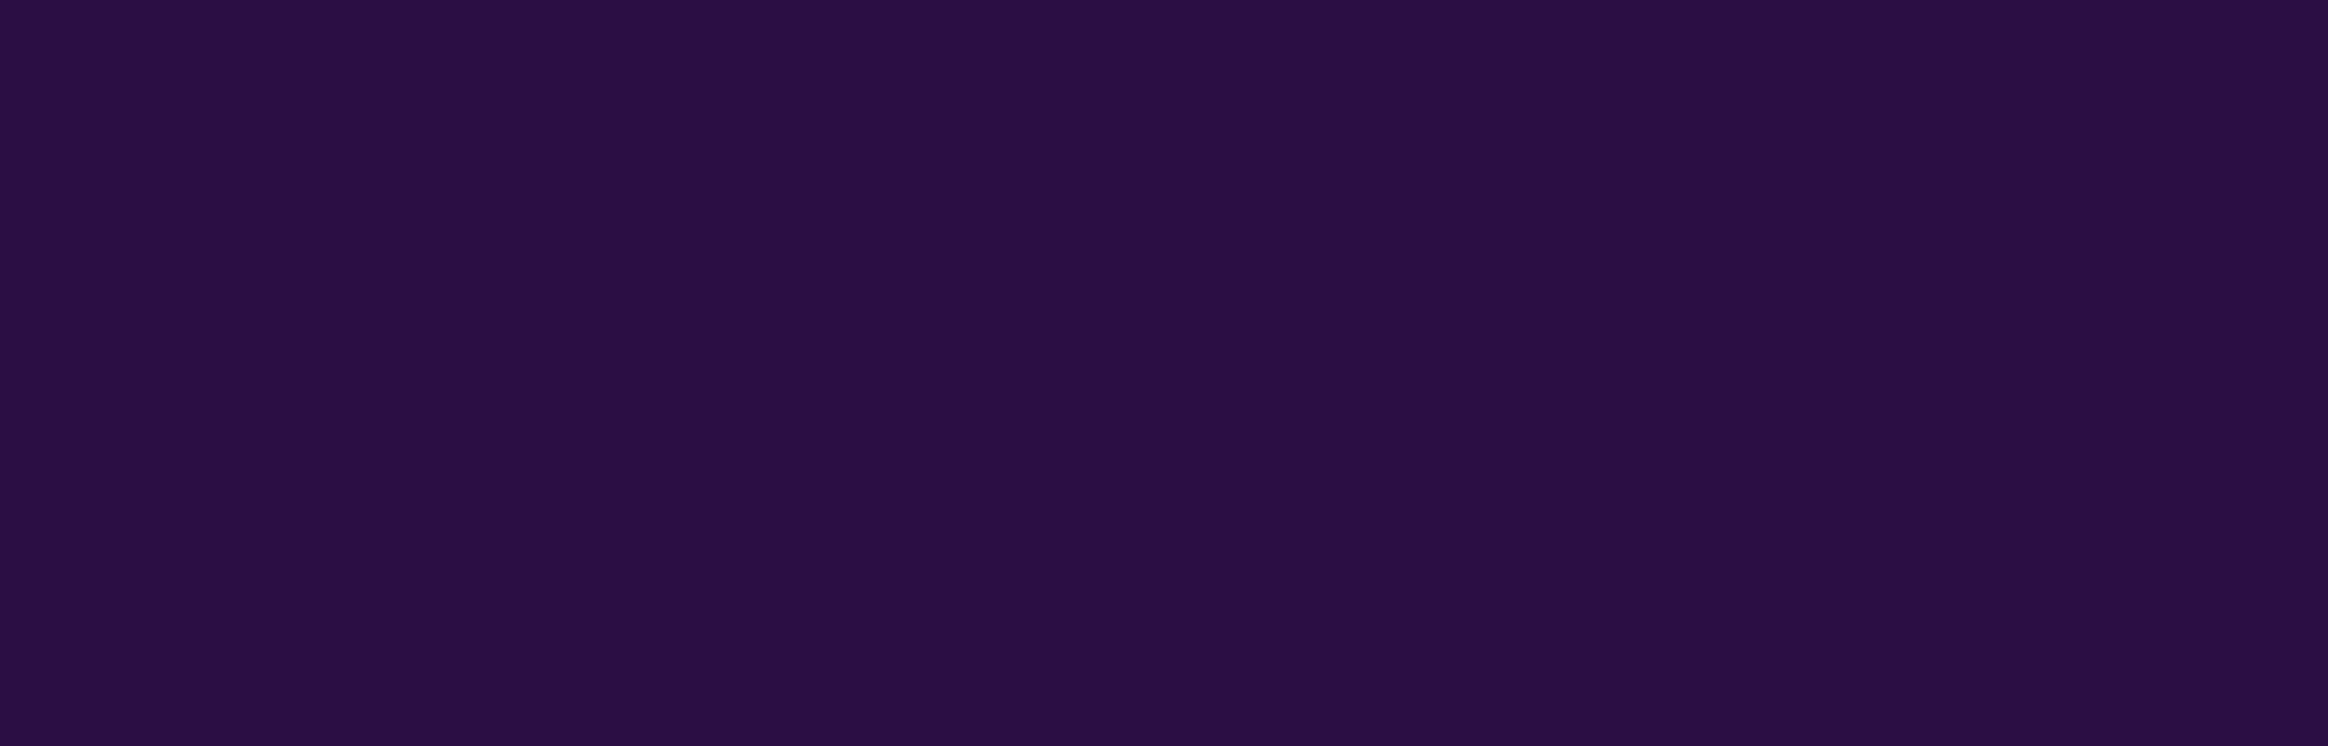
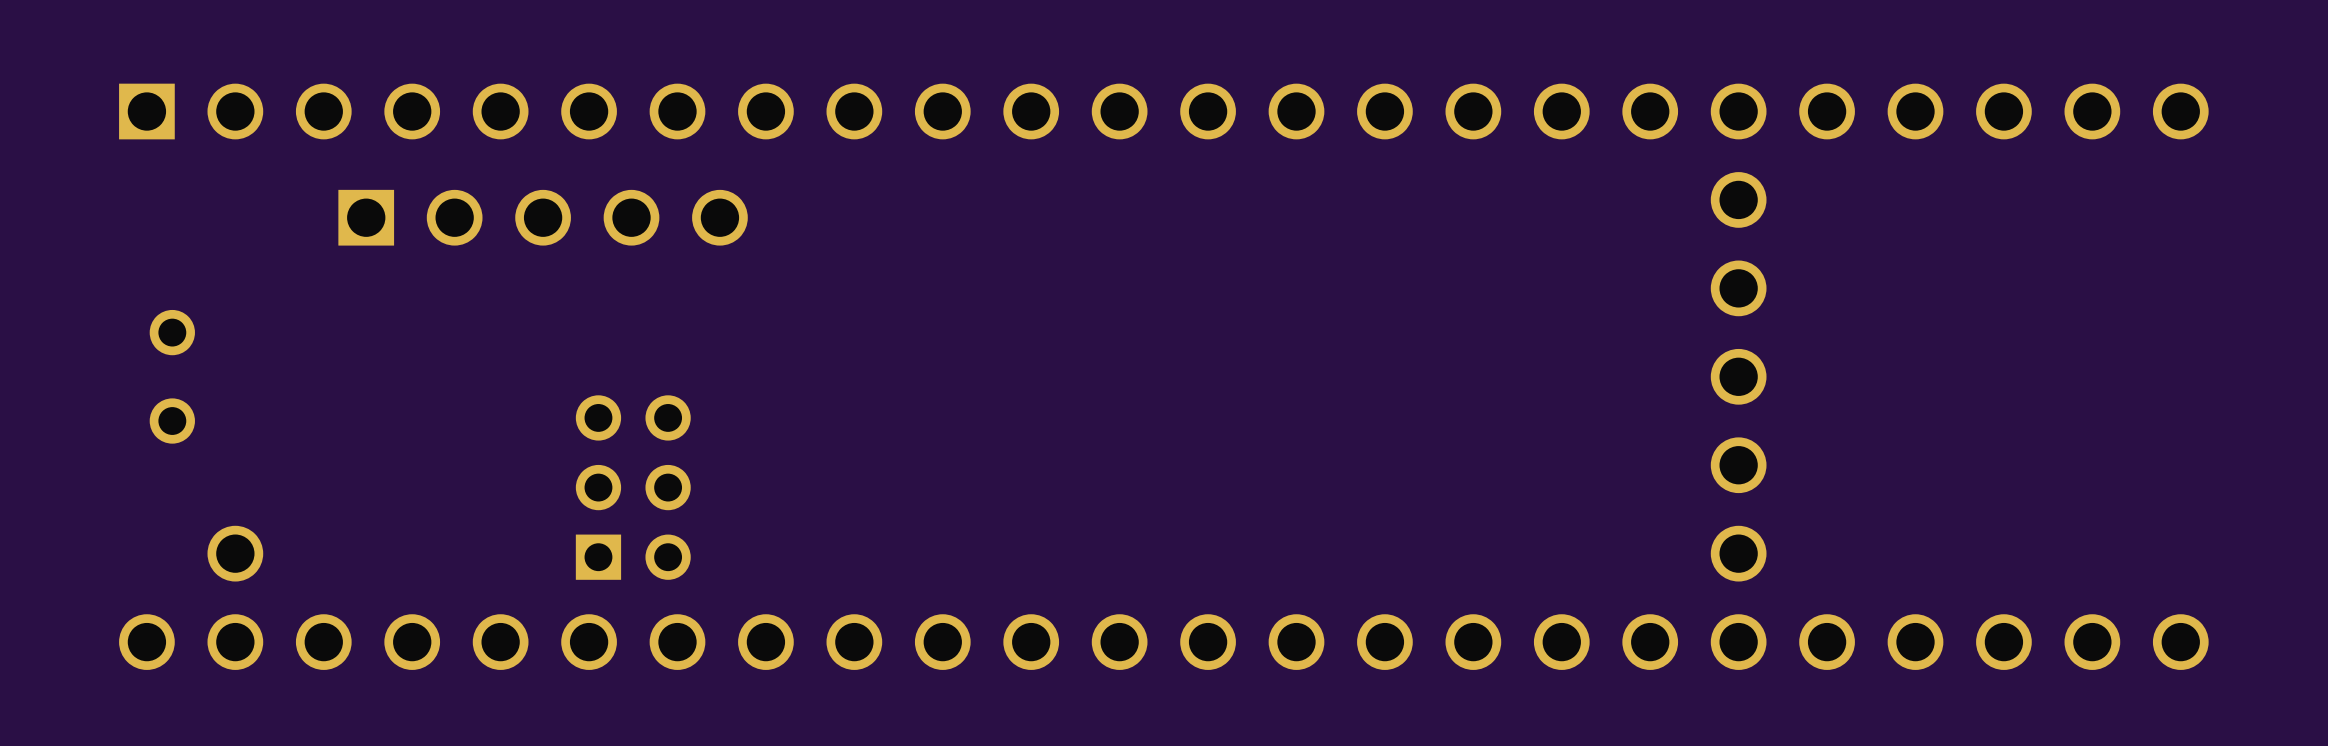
part: none -> (1163, 376)

